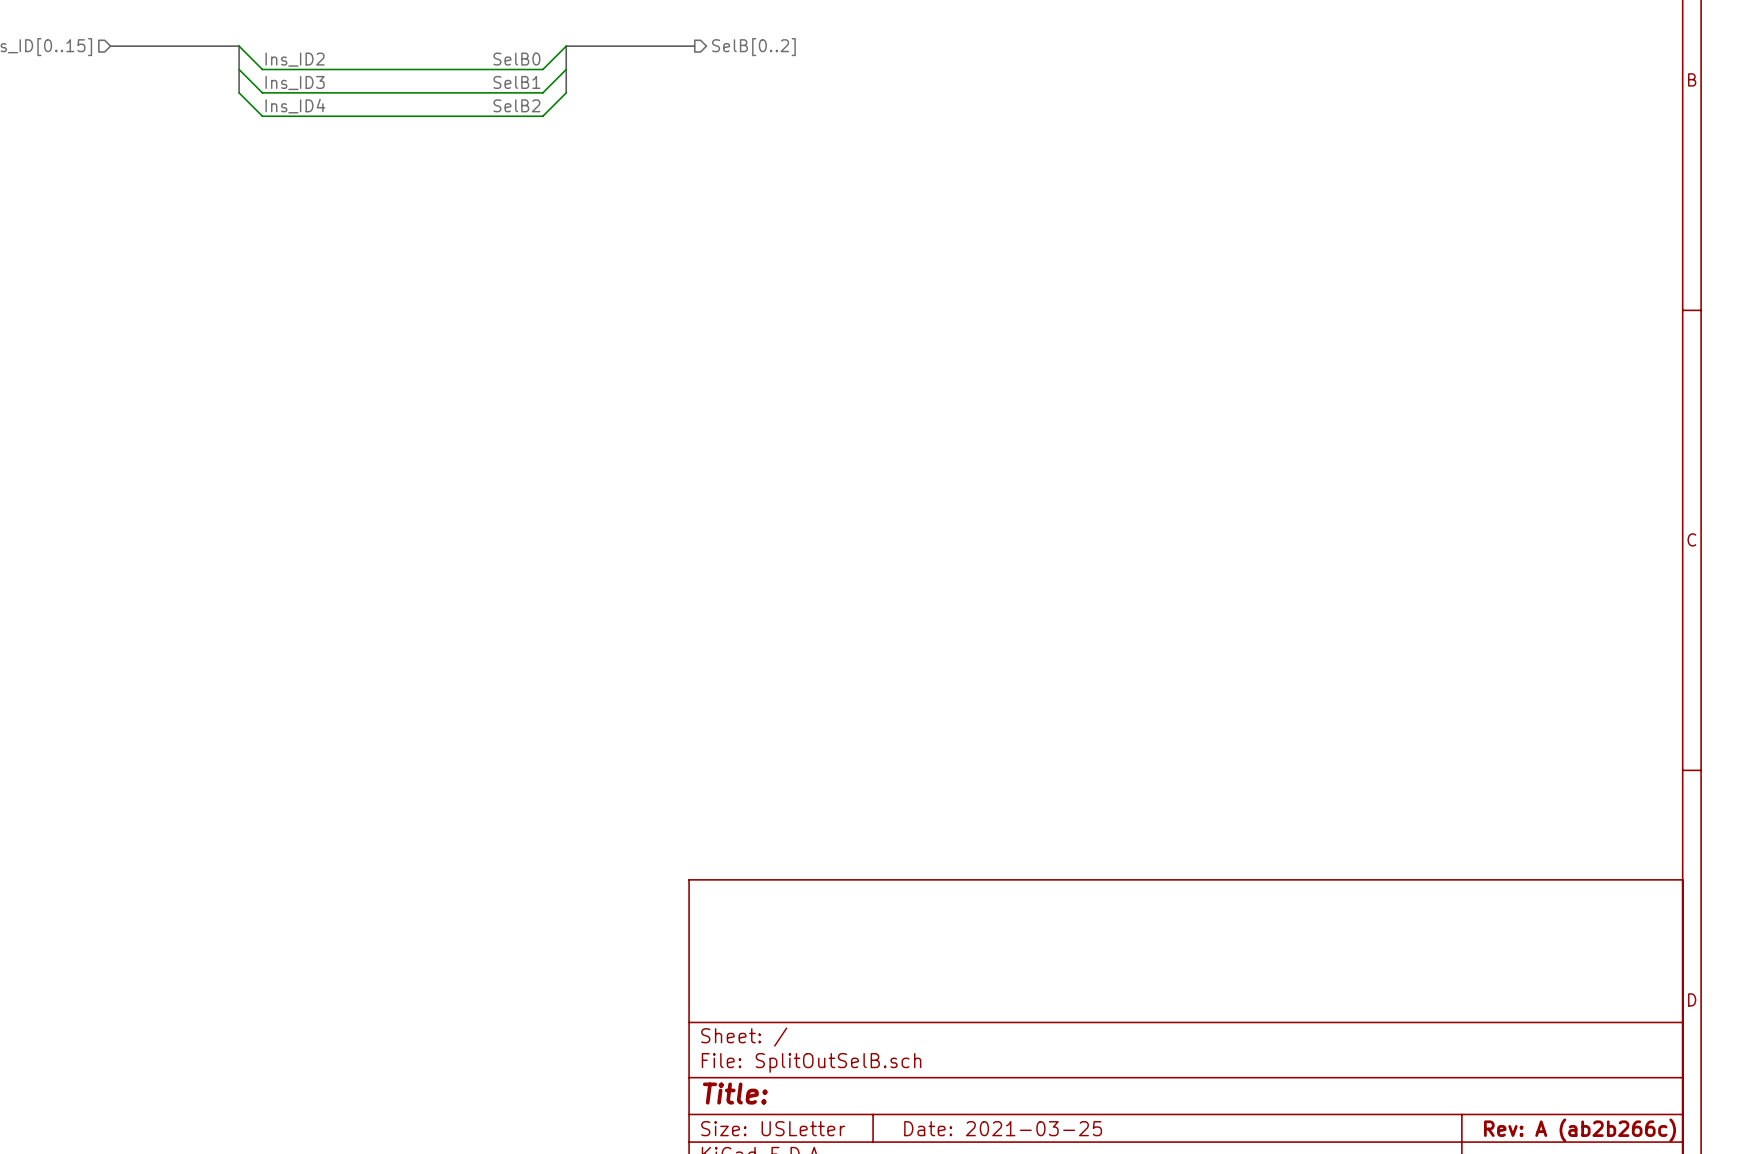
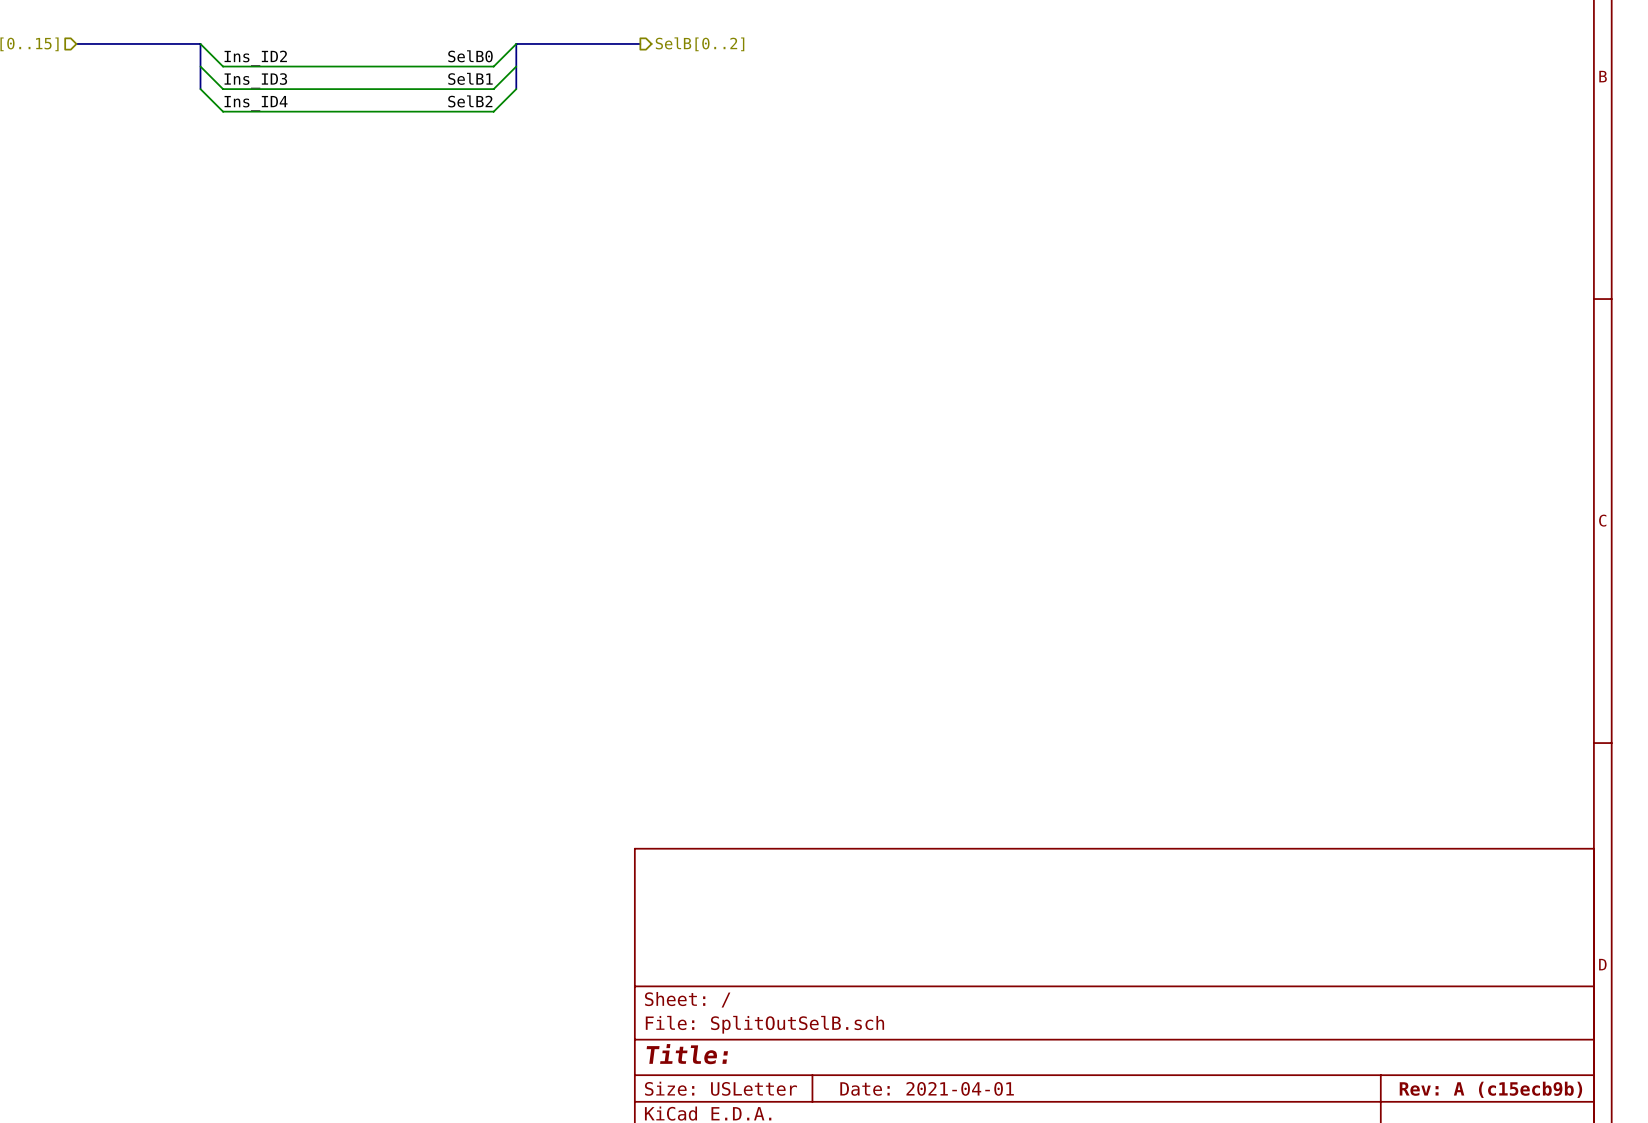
title block: Date: 2021-03-25 (1003, 1128) -> Date: 2021-04-01 (927, 1088)
title block: Rev: A (ab2b266c) (1580, 1130) -> Rev: A (c15ecb9b) (1490, 1089)

